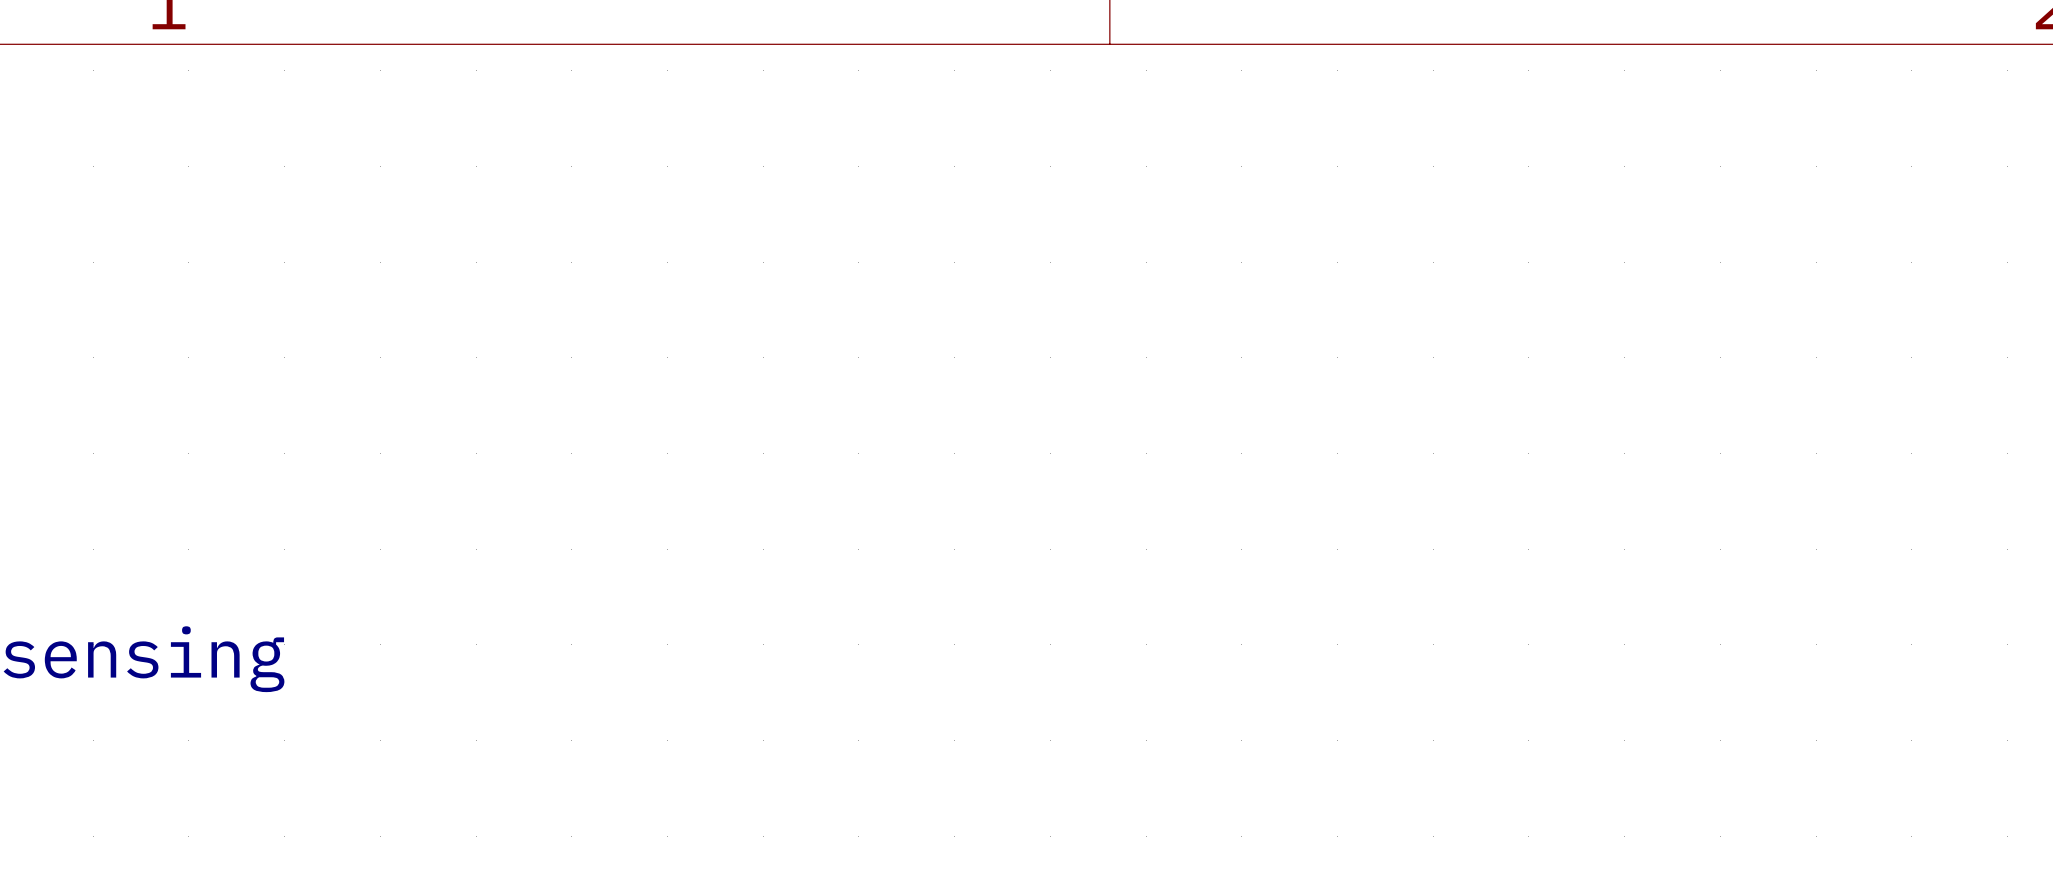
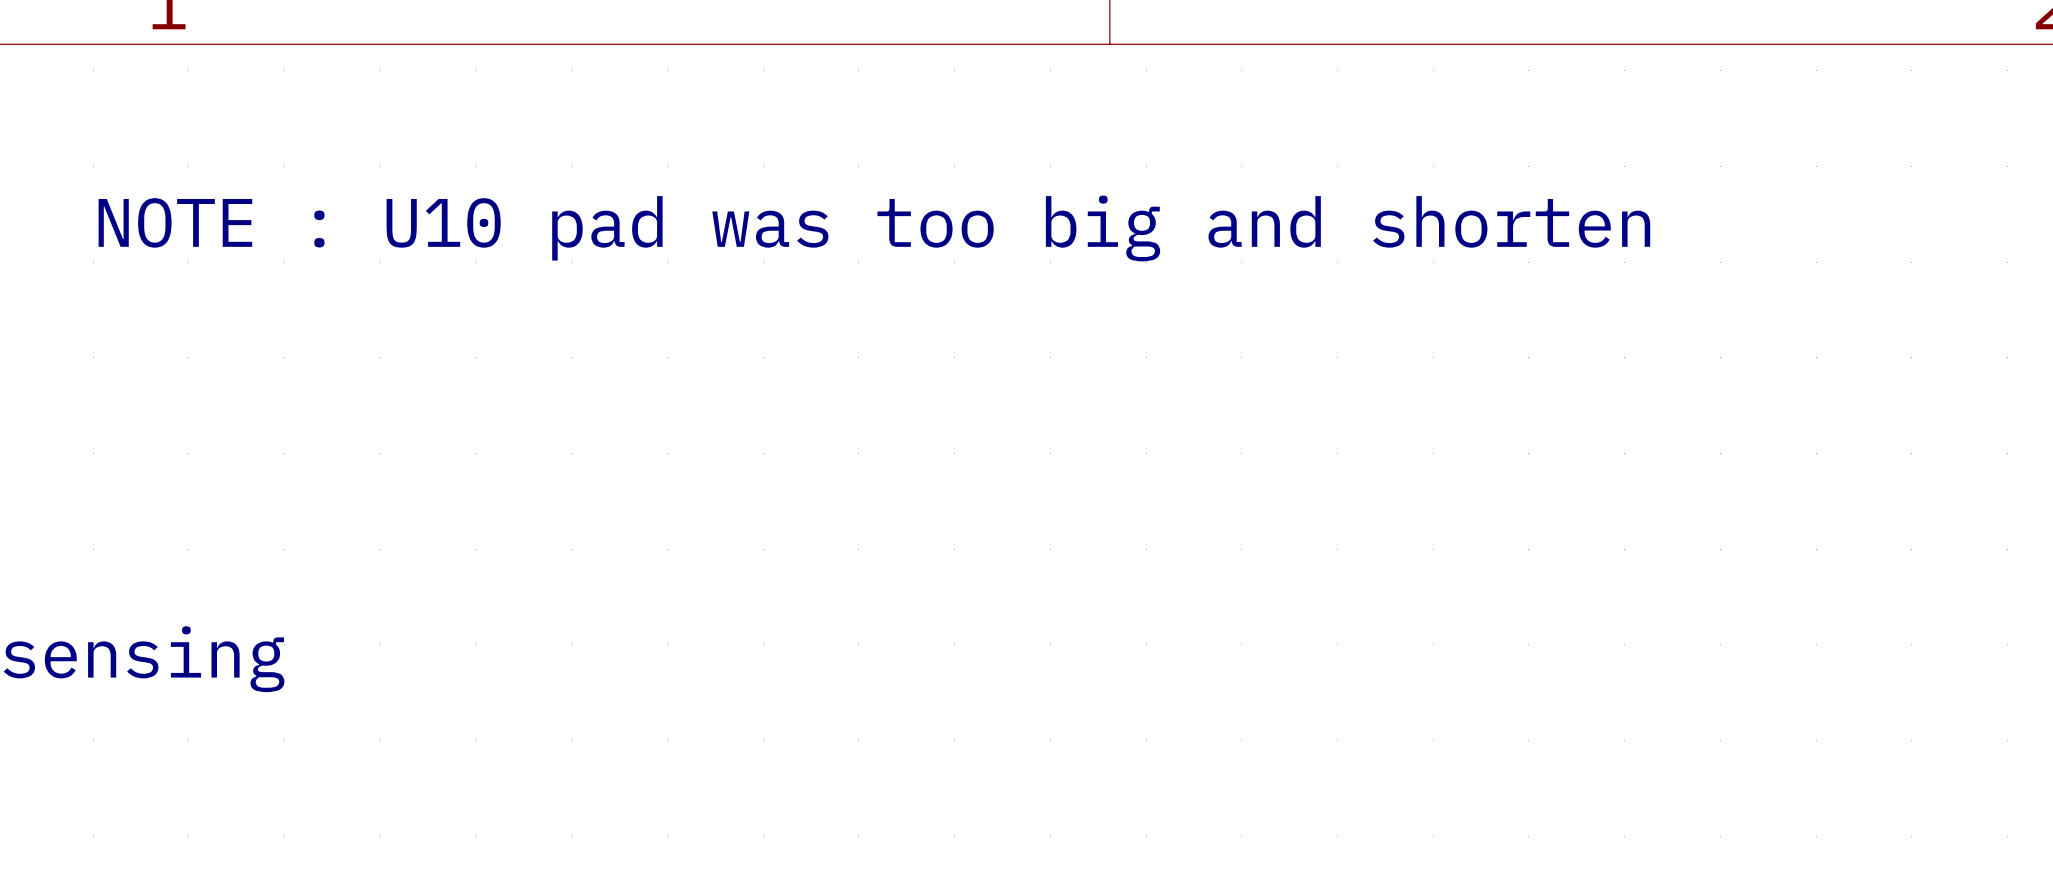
text: none -> NOTE : U10 pad was too big and shorten (874, 228)

